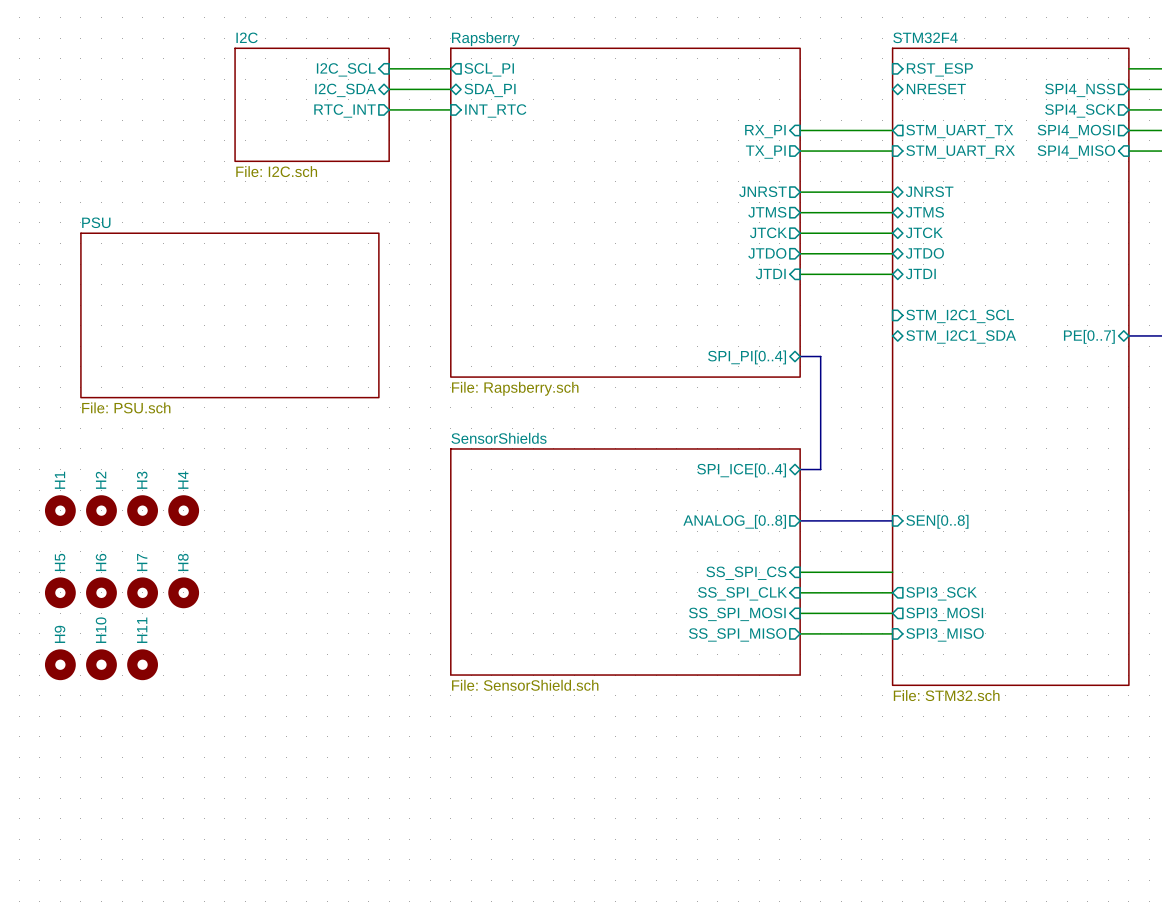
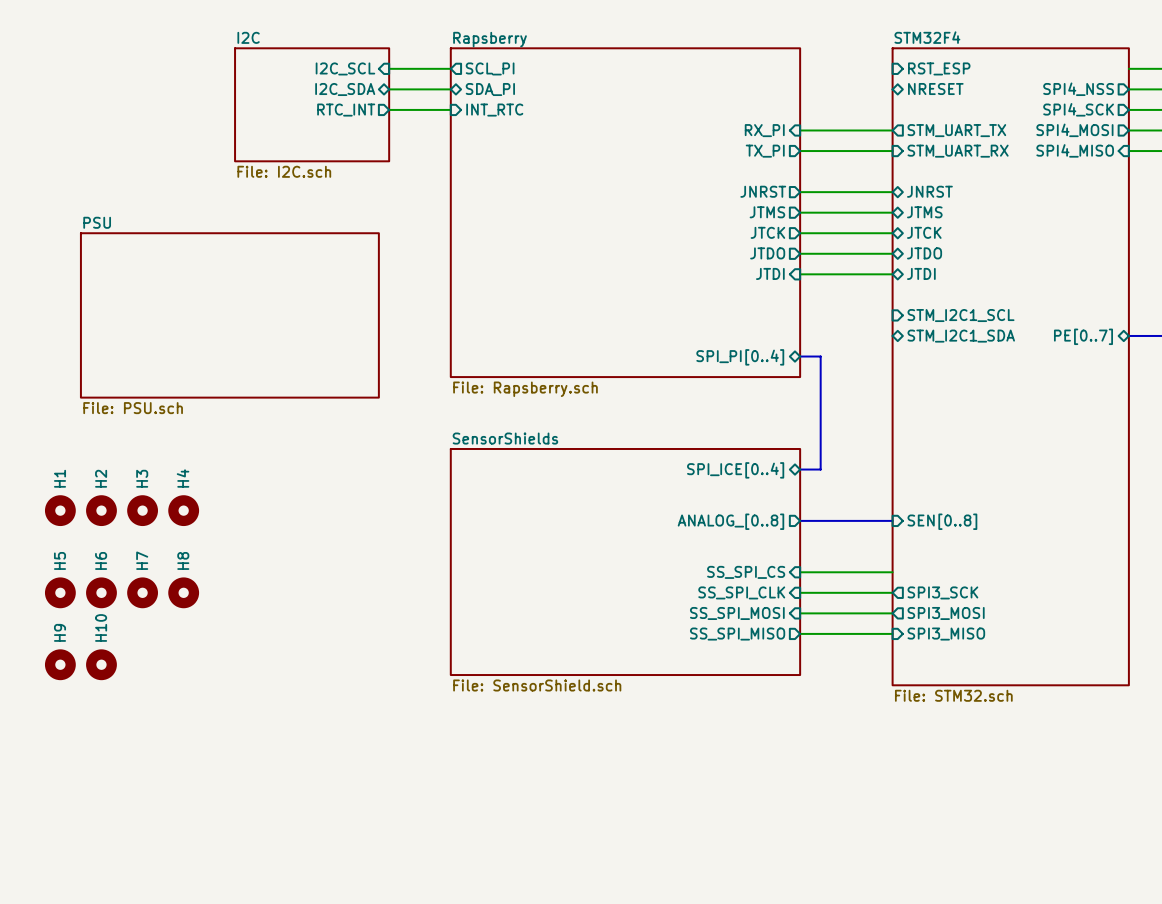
H11: (142, 664) -> none

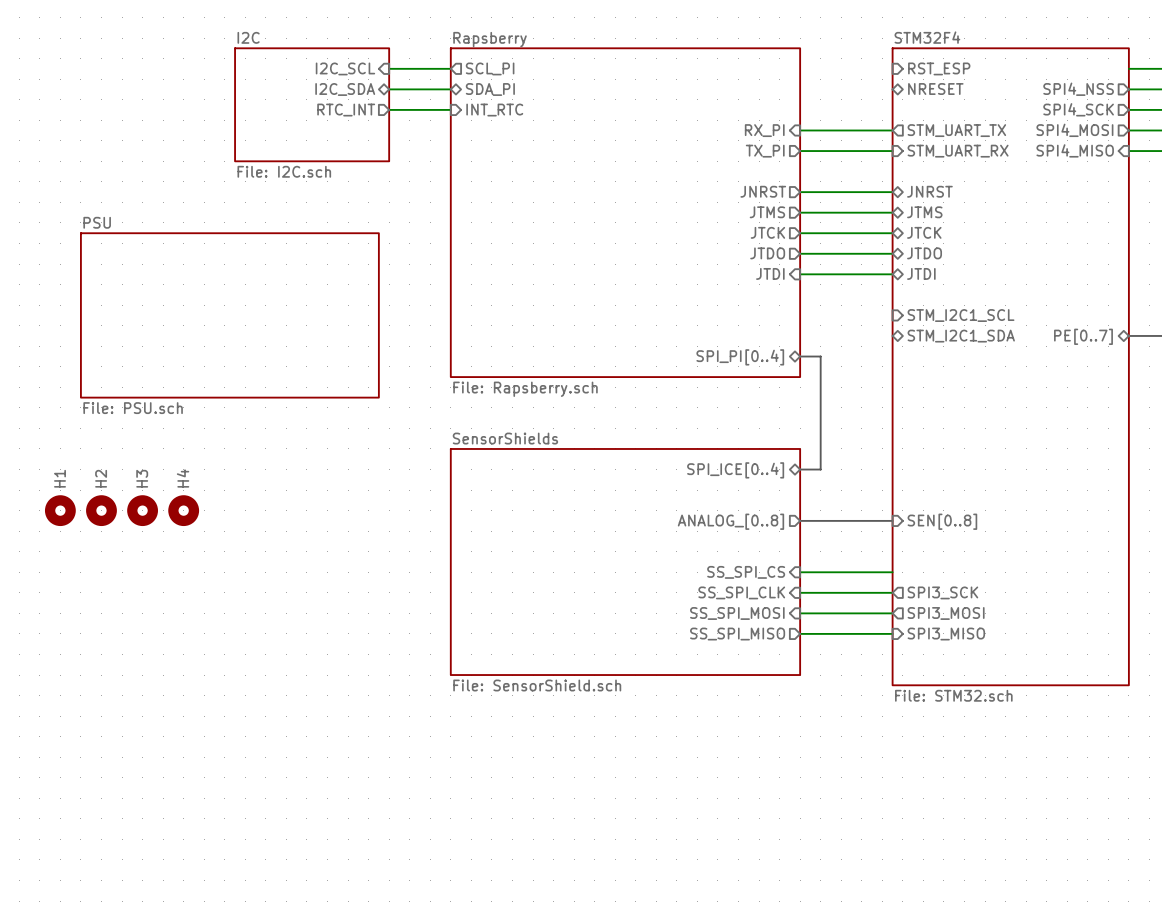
H5: (60, 592) -> none
H6: (101, 592) -> none
H7: (142, 592) -> none
H8: (183, 592) -> none
H9: (60, 664) -> none
H10: (101, 664) -> none

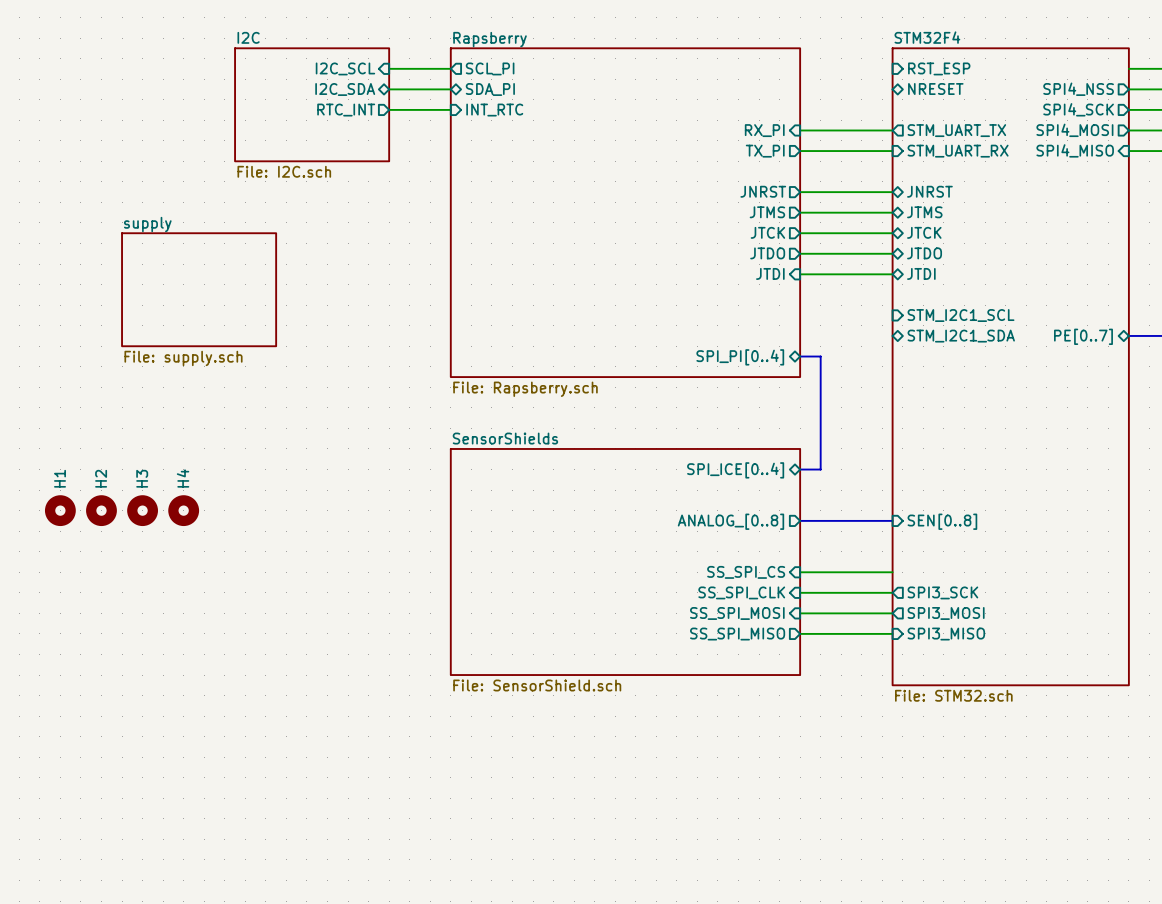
sheet supply: none -> File: supply.sch (199, 289)
sheet PSU: File: PSU.sch (229, 315) -> none

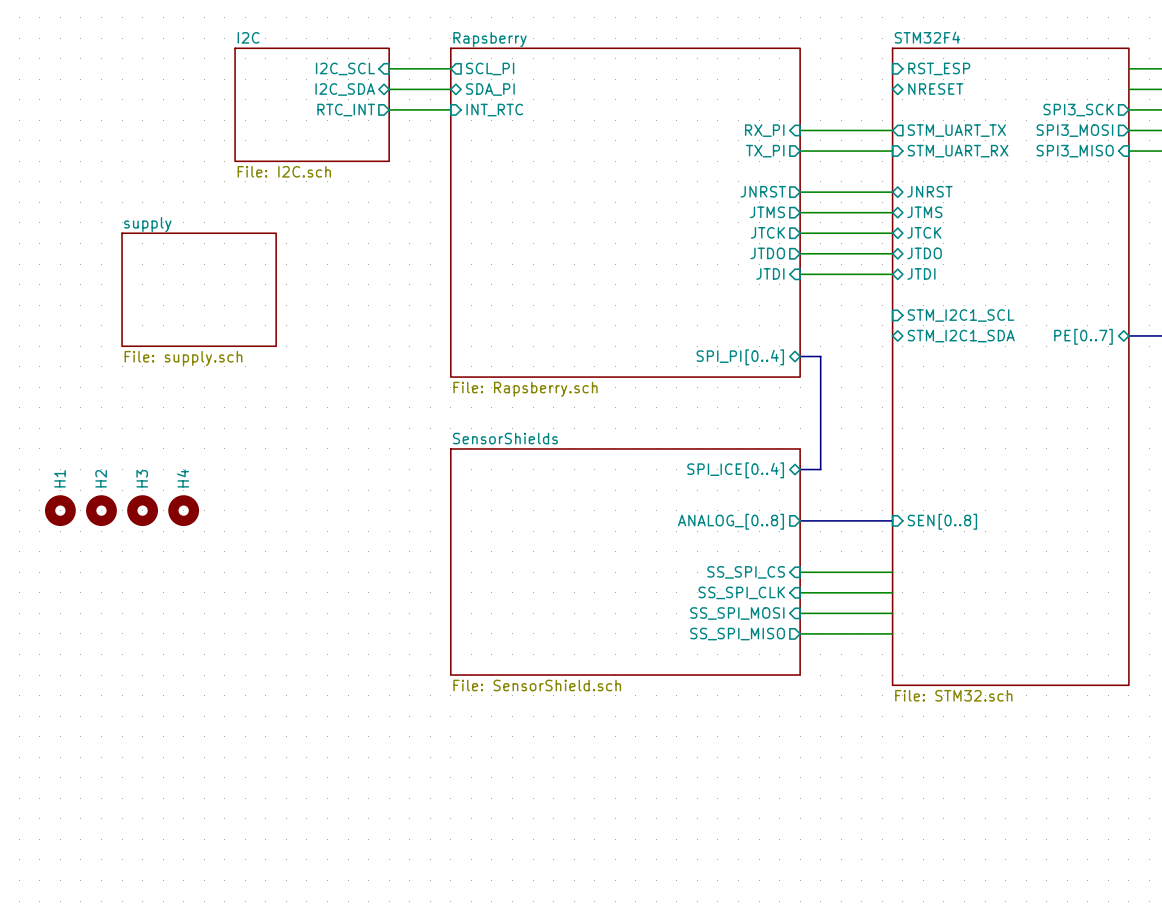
sheet pin: SPI4_NSS (1078, 89) -> none
sheet pin: SPI4_SCK (1078, 109) -> SPI3_SCK (1078, 110)
sheet pin: SPI4_MOSI (1074, 130) -> SPI3_MOSI (1074, 130)
sheet pin: SPI4_MISO (1075, 150) -> SPI3_MISO (1075, 151)
sheet pin: SPI3_SCK (942, 592) -> none
sheet pin: SPI3_MOSI (946, 613) -> none
sheet pin: SPI3_MISO (946, 634) -> none

